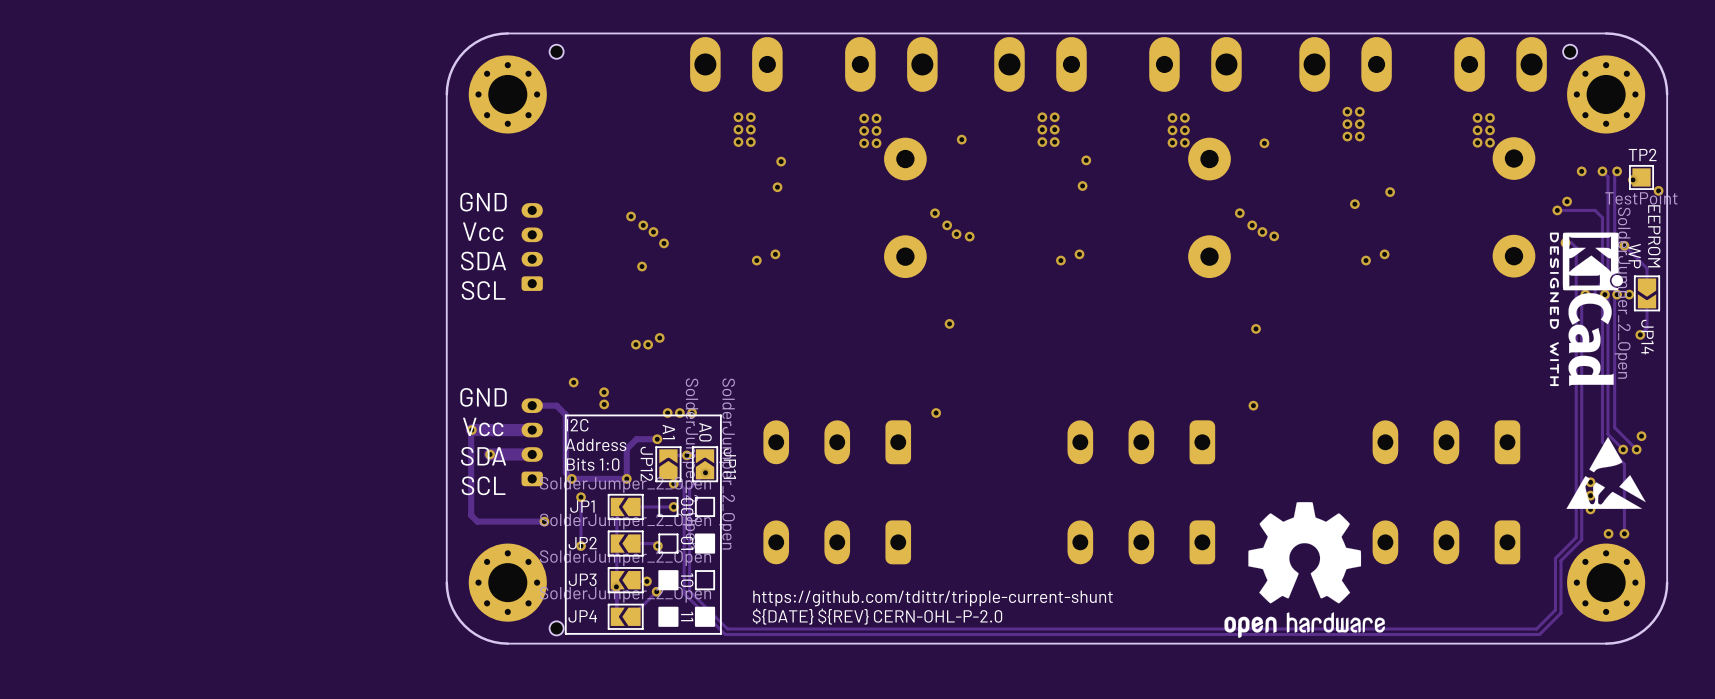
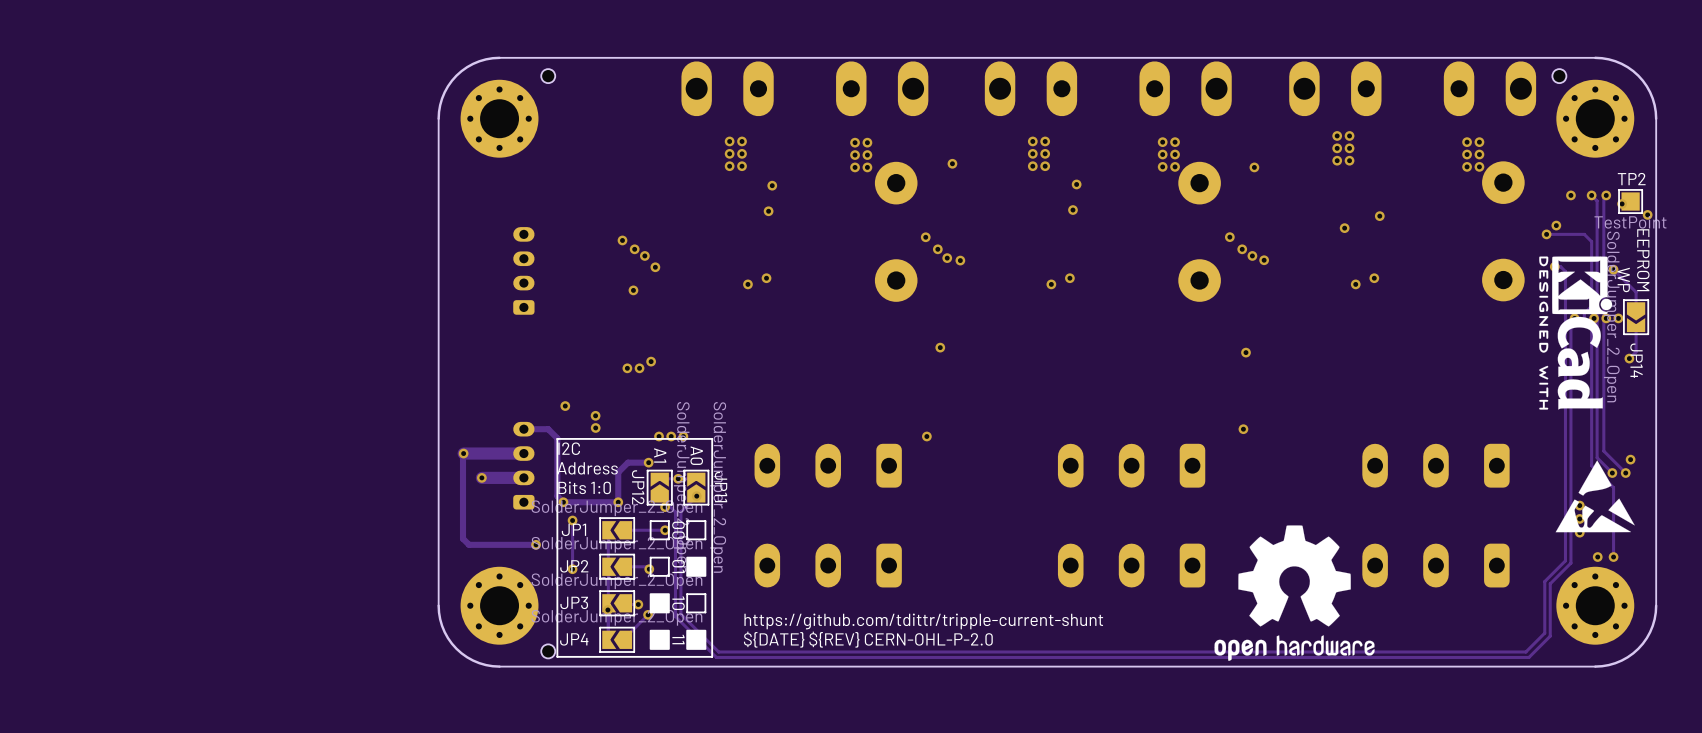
text: GND (483, 202) -> none
text: Vcc (483, 231) -> none
text: SDA (483, 261) -> none
text: SCL (483, 290) -> none
text: GND (483, 397) -> none
text: Vcc (483, 426) -> none
text: SDA (483, 456) -> none
text: SCL (483, 485) -> none

